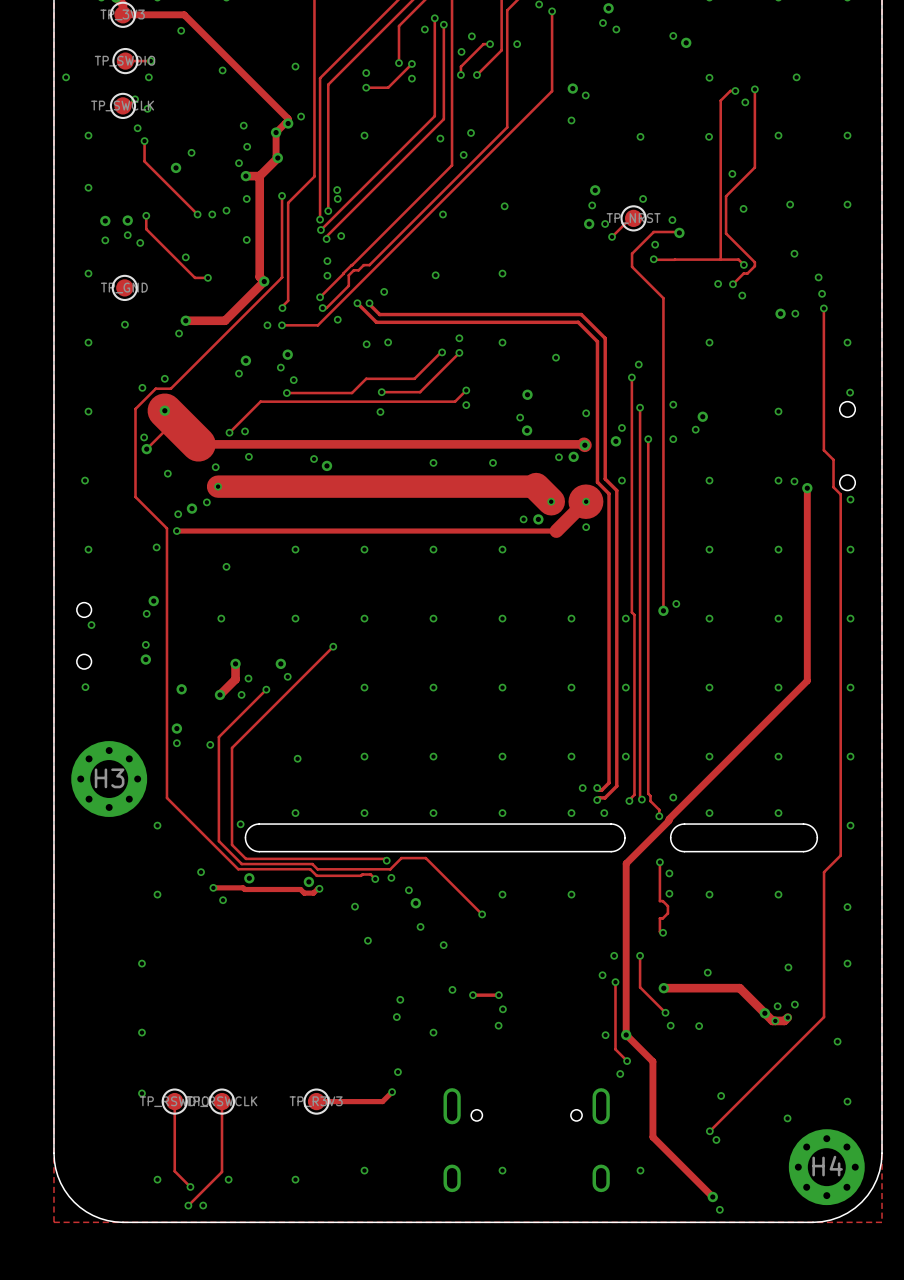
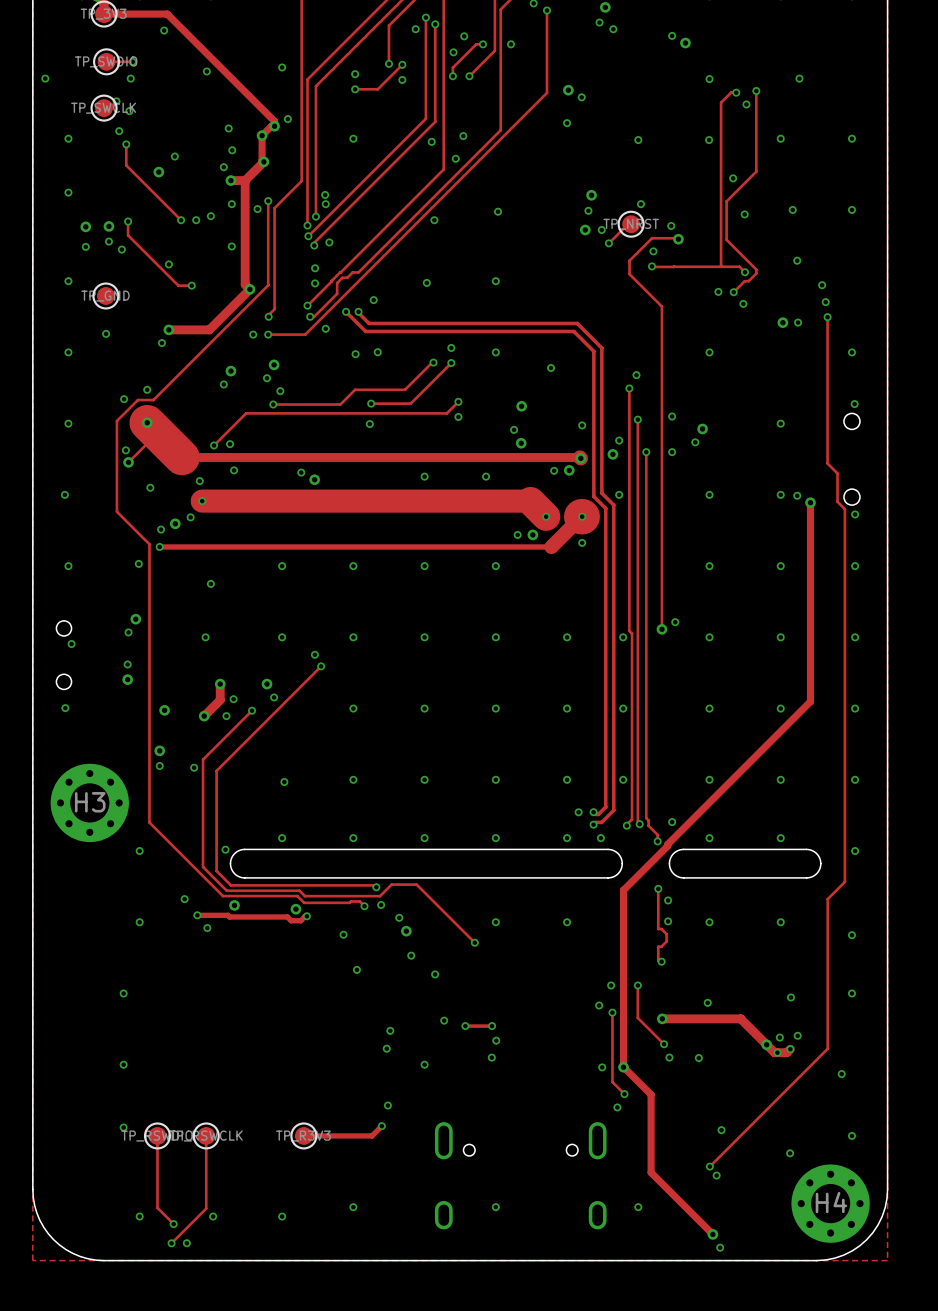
via: none -> (257, 209)
via: none -> (314, 654)

